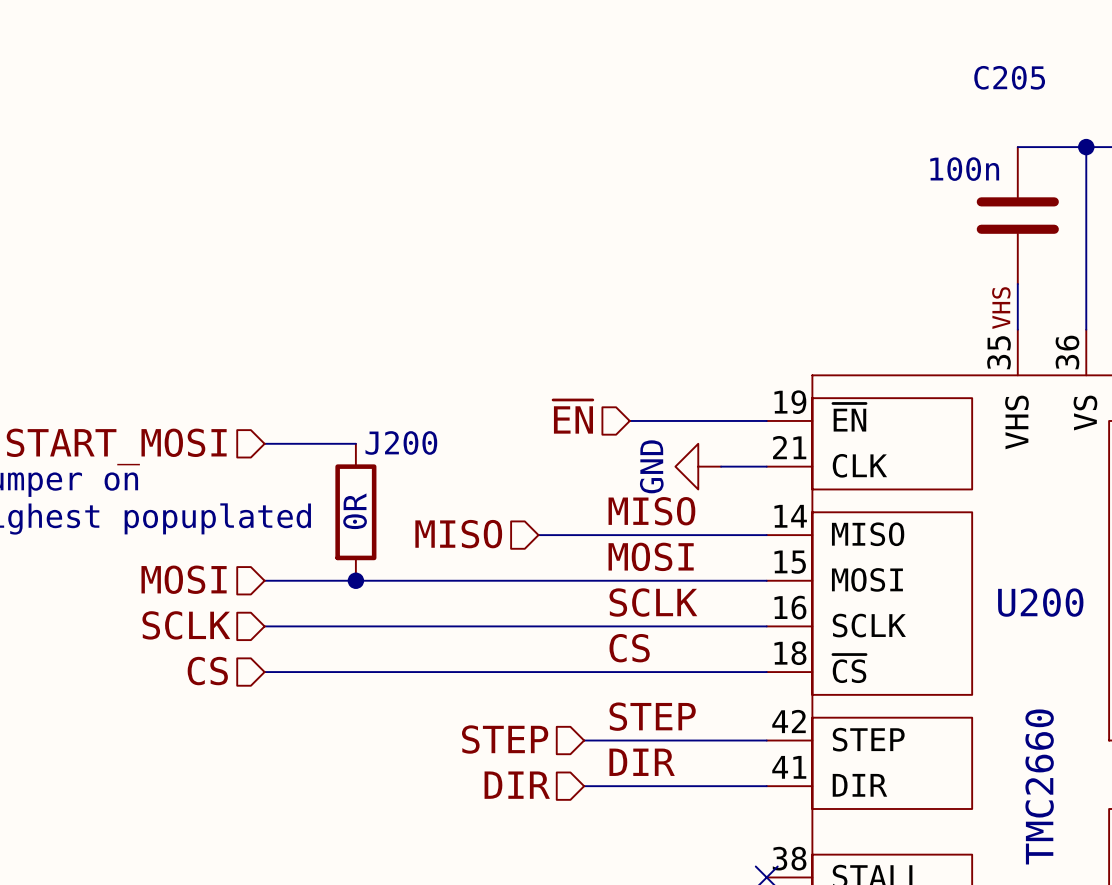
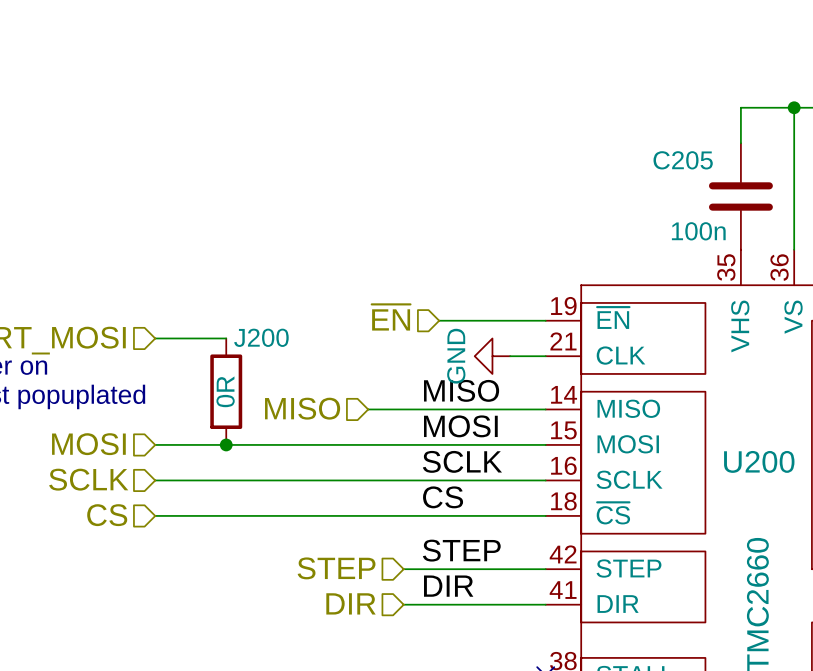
C205 name position: C205 (1009, 77) -> C205 (683, 160)
C205 value position: 100n (964, 169) -> 100n (698, 231)
C205 position: (1017, 215) -> (740, 196)
label: VHS (1001, 308) -> none

